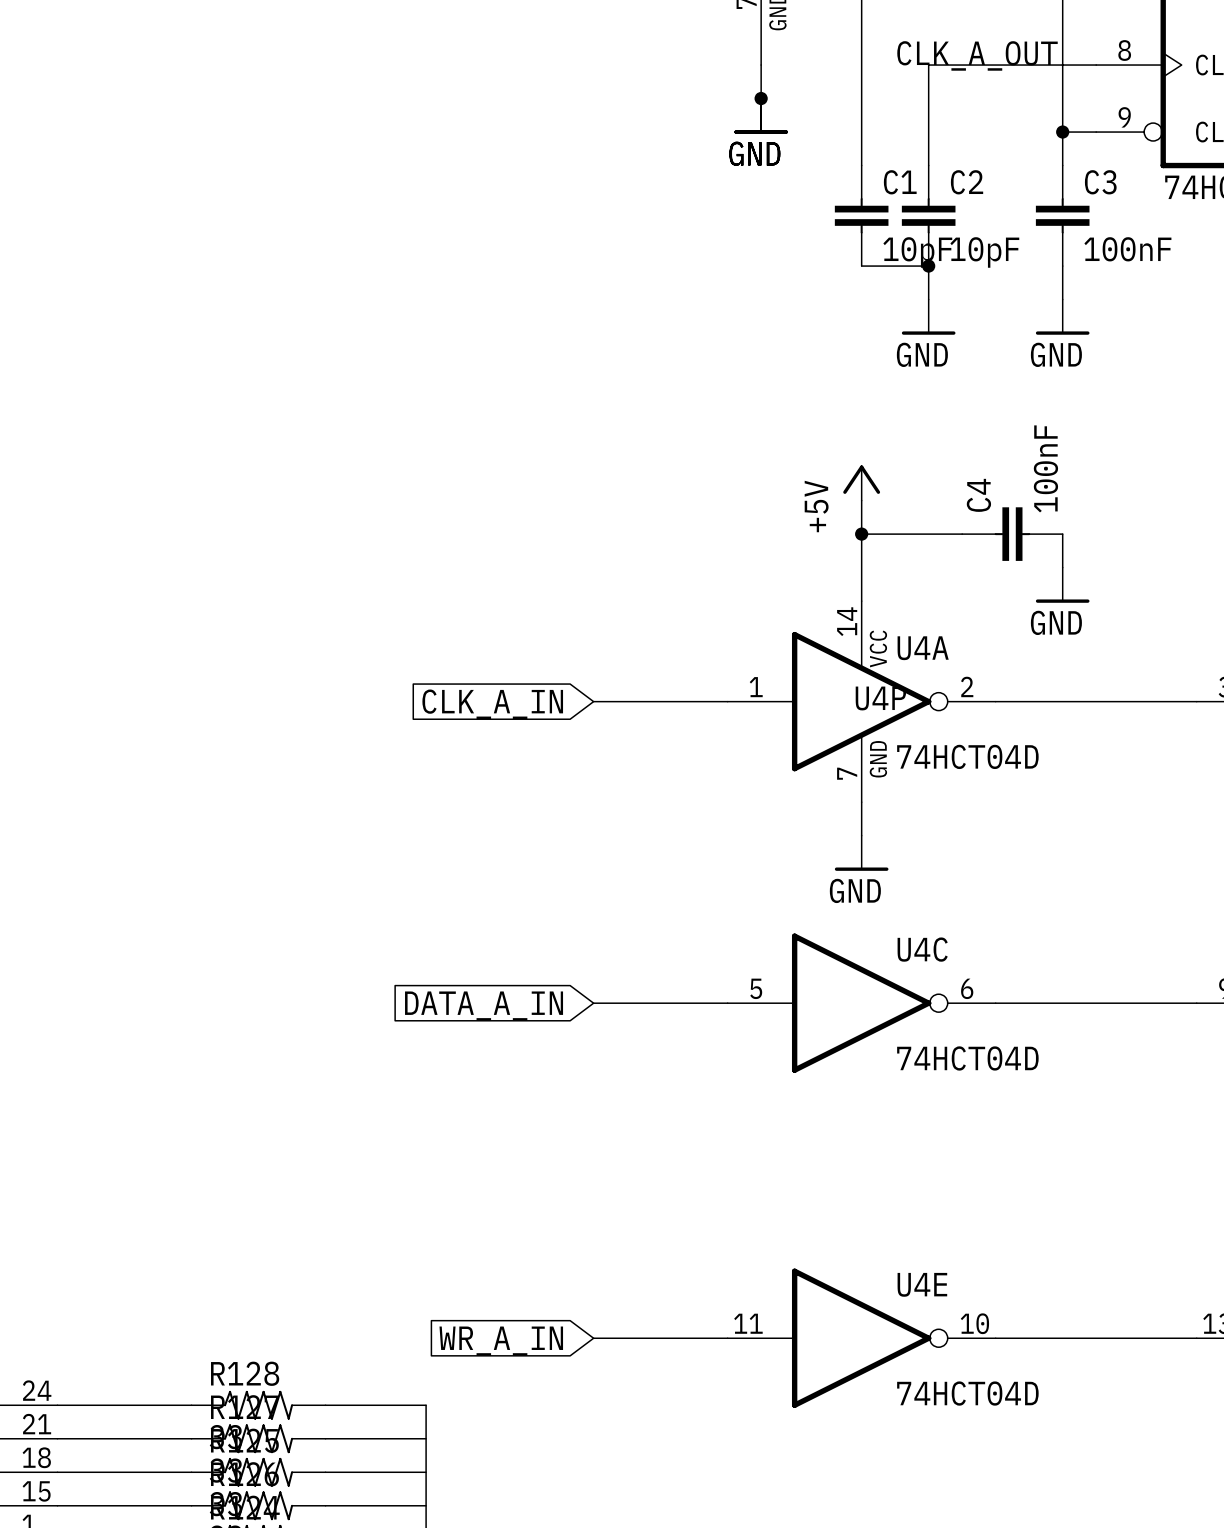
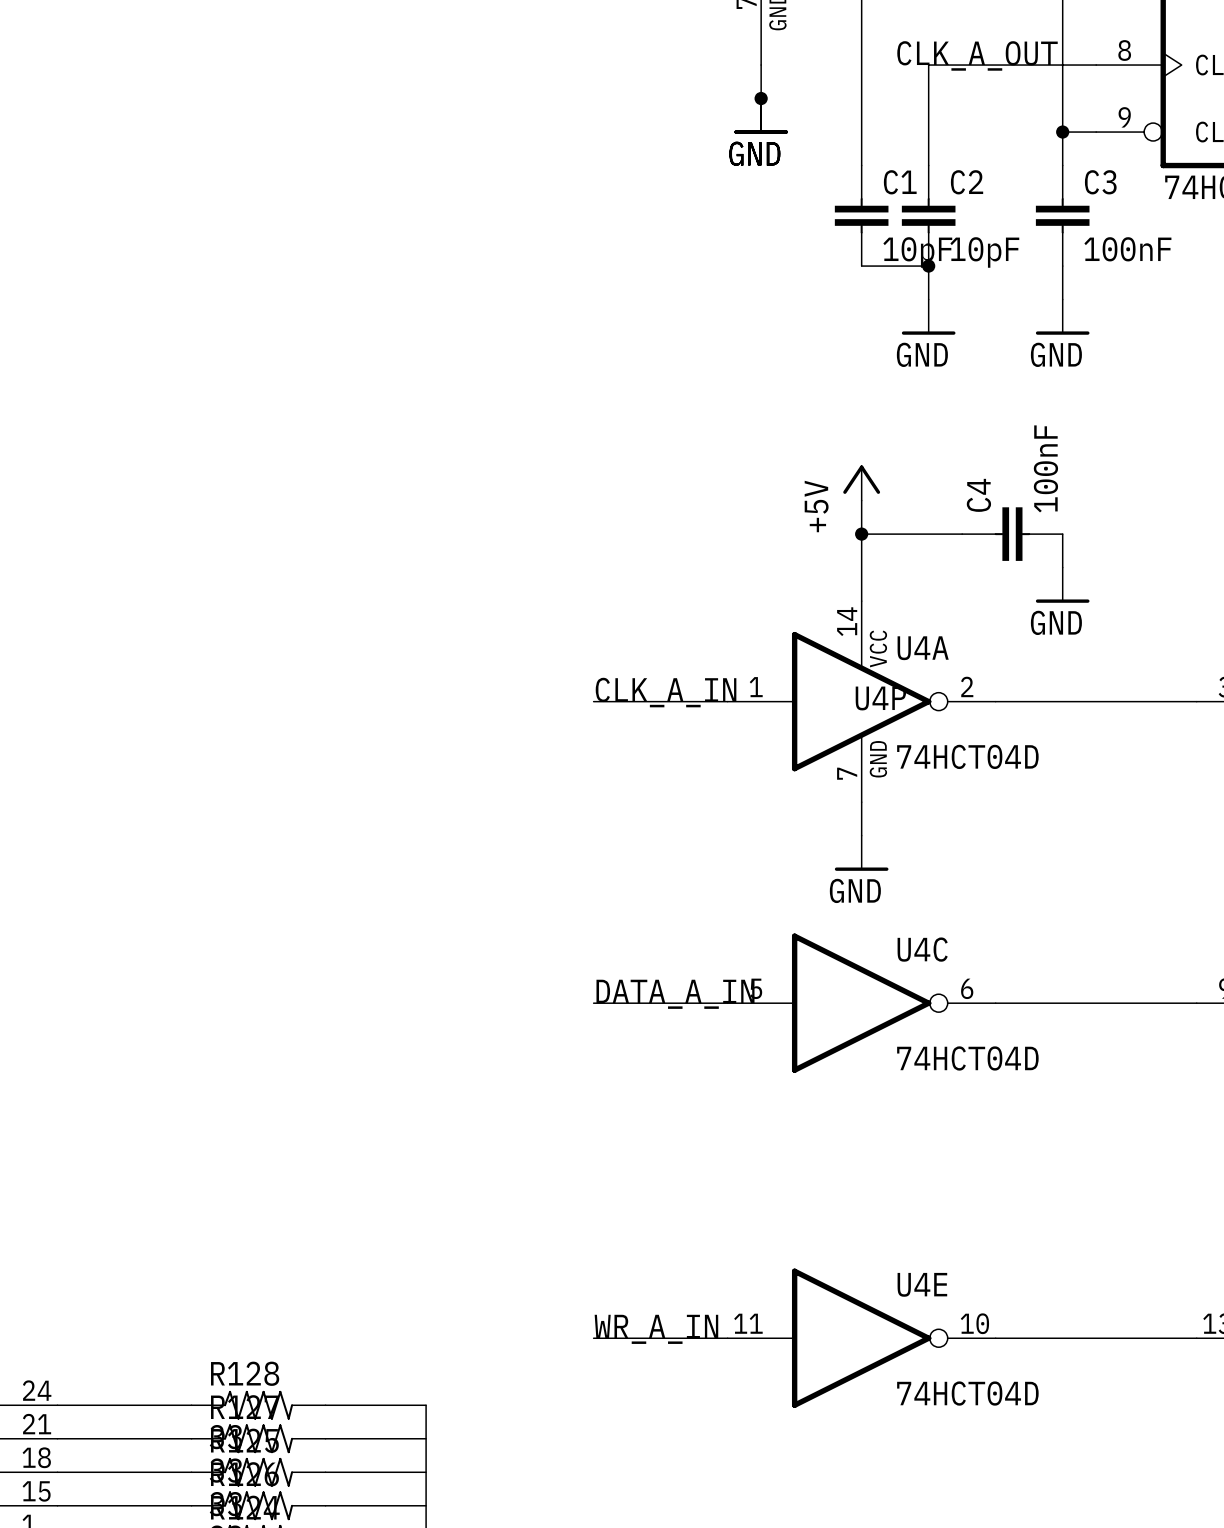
label: none -> CLK_A_IN (666, 692)
global label: CLK_A_IN (492, 704) -> none
label: none -> DATA_A_IN (675, 994)
global label: DATA_A_IN (484, 1006) -> none
label: none -> WR_A_IN (656, 1329)
global label: WR_A_IN (501, 1341) -> none

